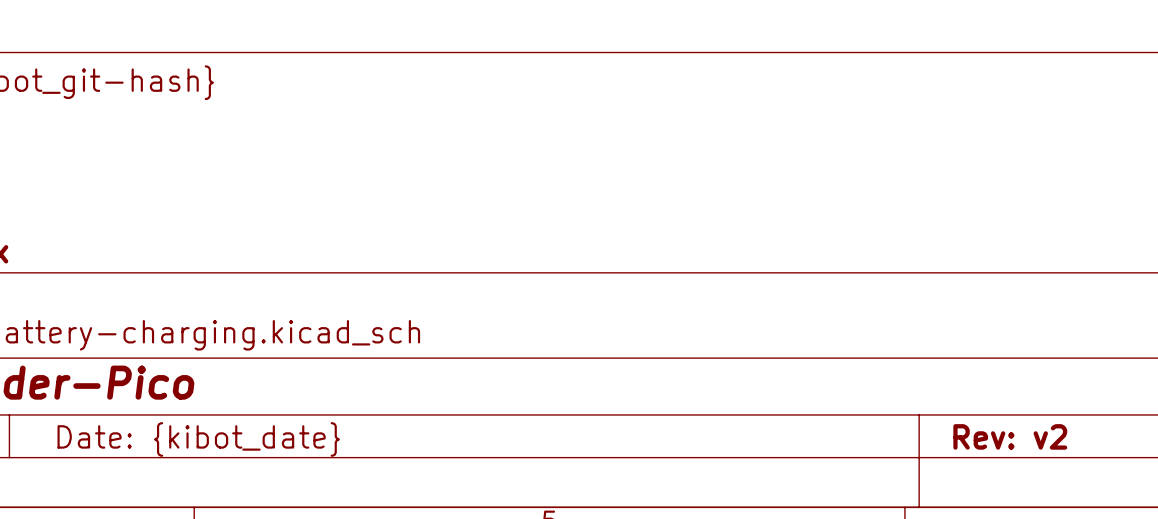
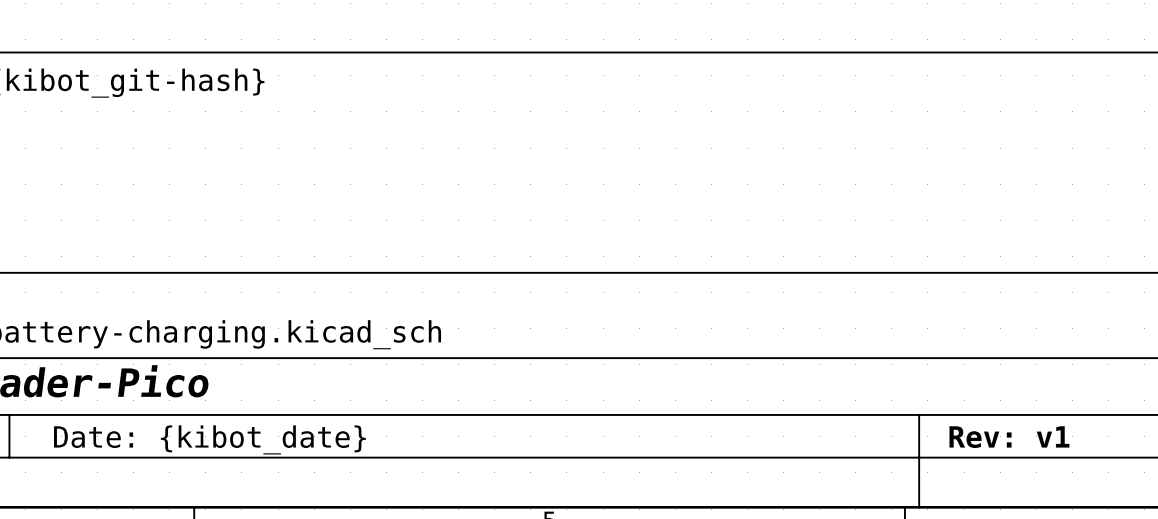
title block: Rev: v2 (1010, 436) -> Rev: v1 (1009, 437)

